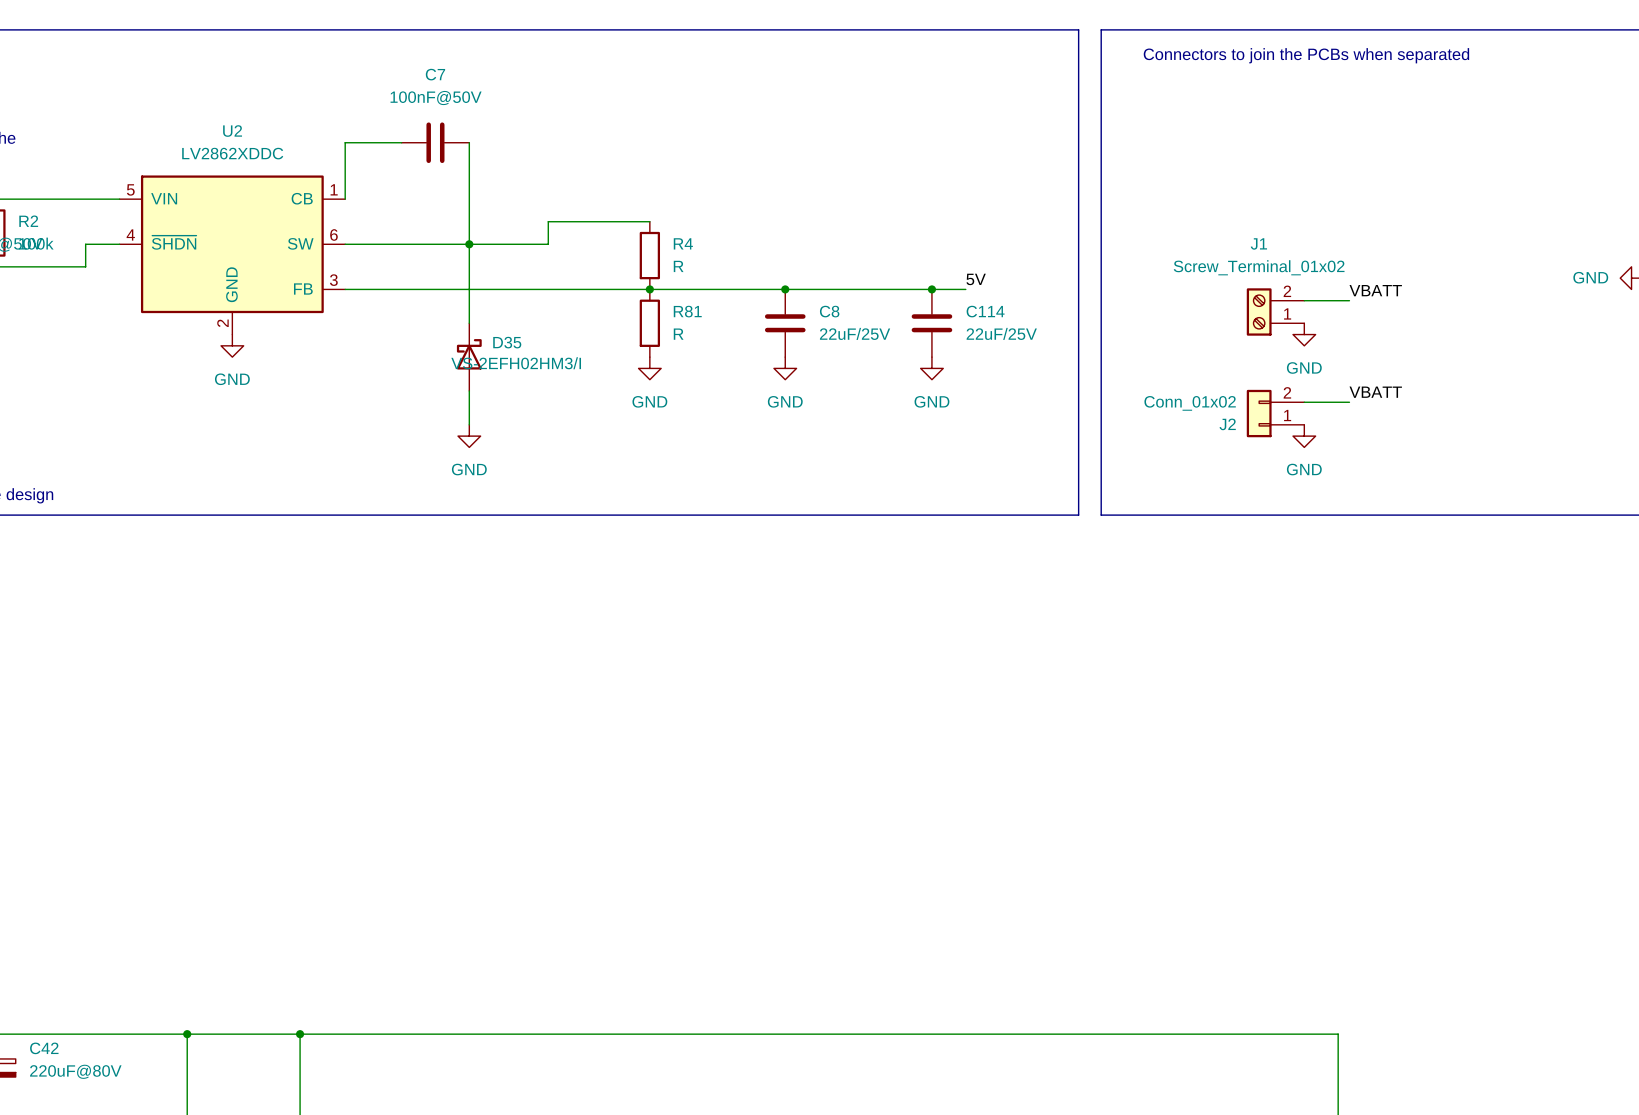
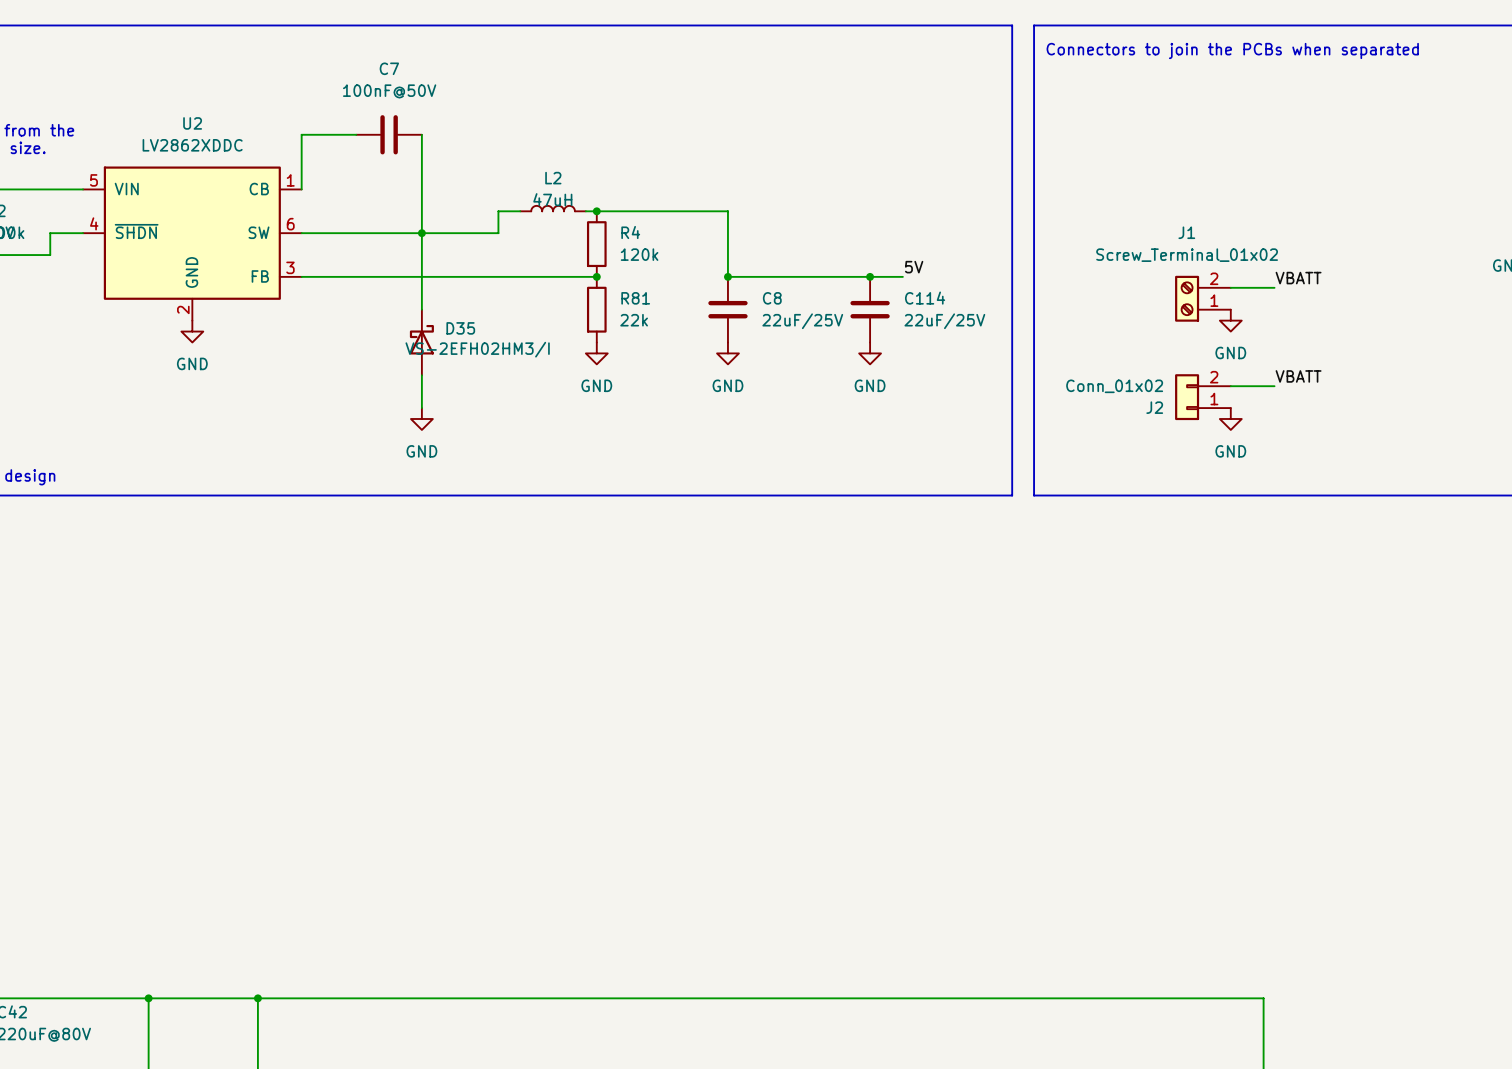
L2: none -> 47uH (553, 208)
wire: (570, 221) (638, 221) -> none
junction: none -> (596, 211)
R4 value: R (678, 266) -> 120k (639, 254)
wire: (649, 289) (785, 289) -> (596, 211) (727, 211) (727, 276)
R81 value: R (678, 334) -> 22k (634, 320)

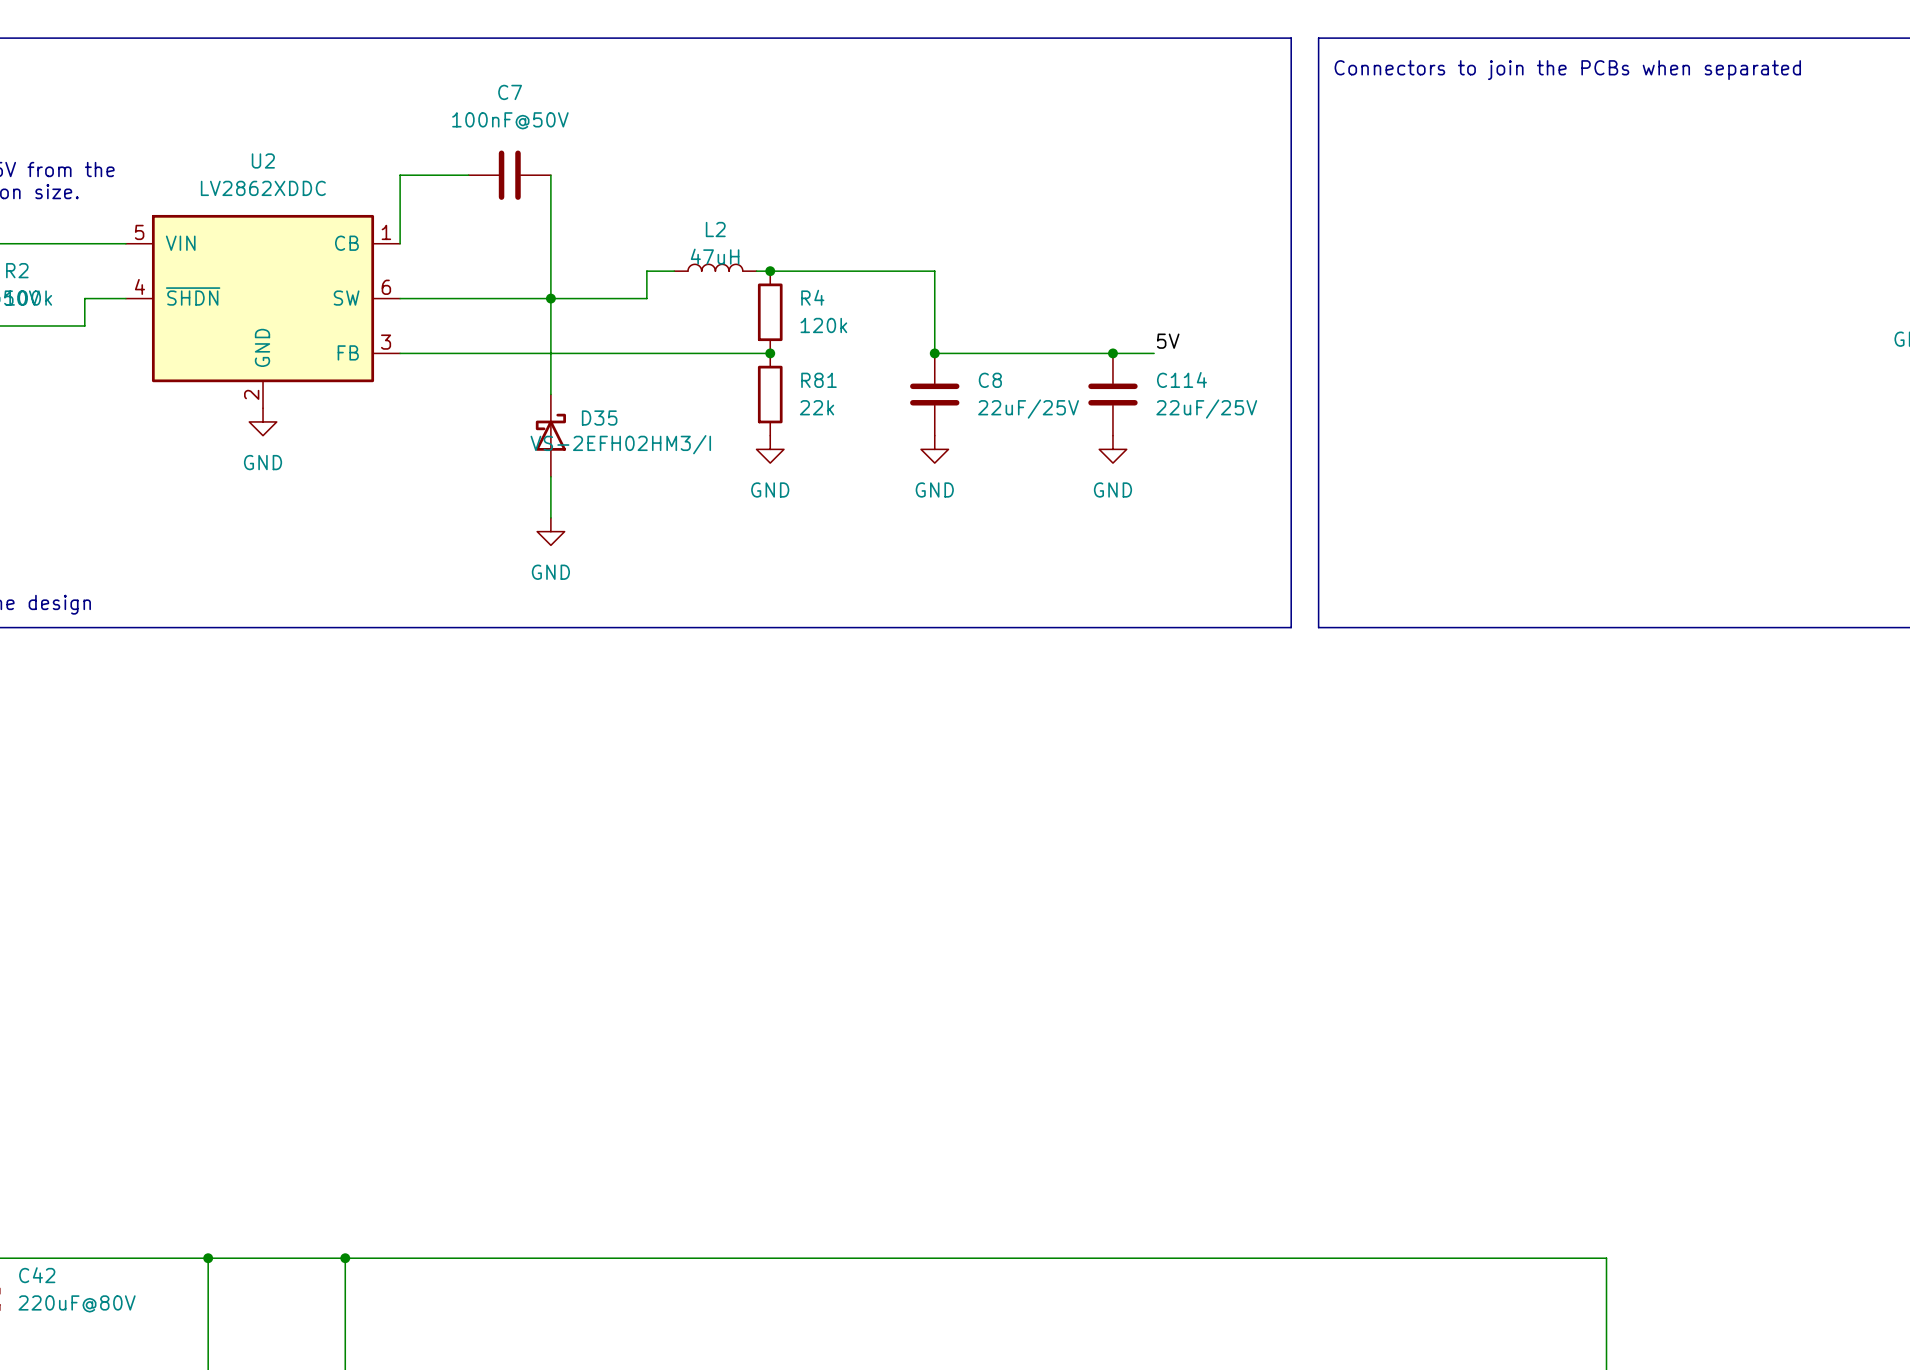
label: VBATT (1298, 278) -> none
wire: (1230, 287) (1274, 287) -> none
J1: Screw_Terminal_01x02 (1202, 298) -> none
power symbol: GND (1230, 320) -> none
label: VBATT (1298, 376) -> none
wire: (1230, 386) (1274, 386) -> none
J2: Conn_01x02 (1202, 397) -> none
power symbol: GND (1230, 419) -> none

